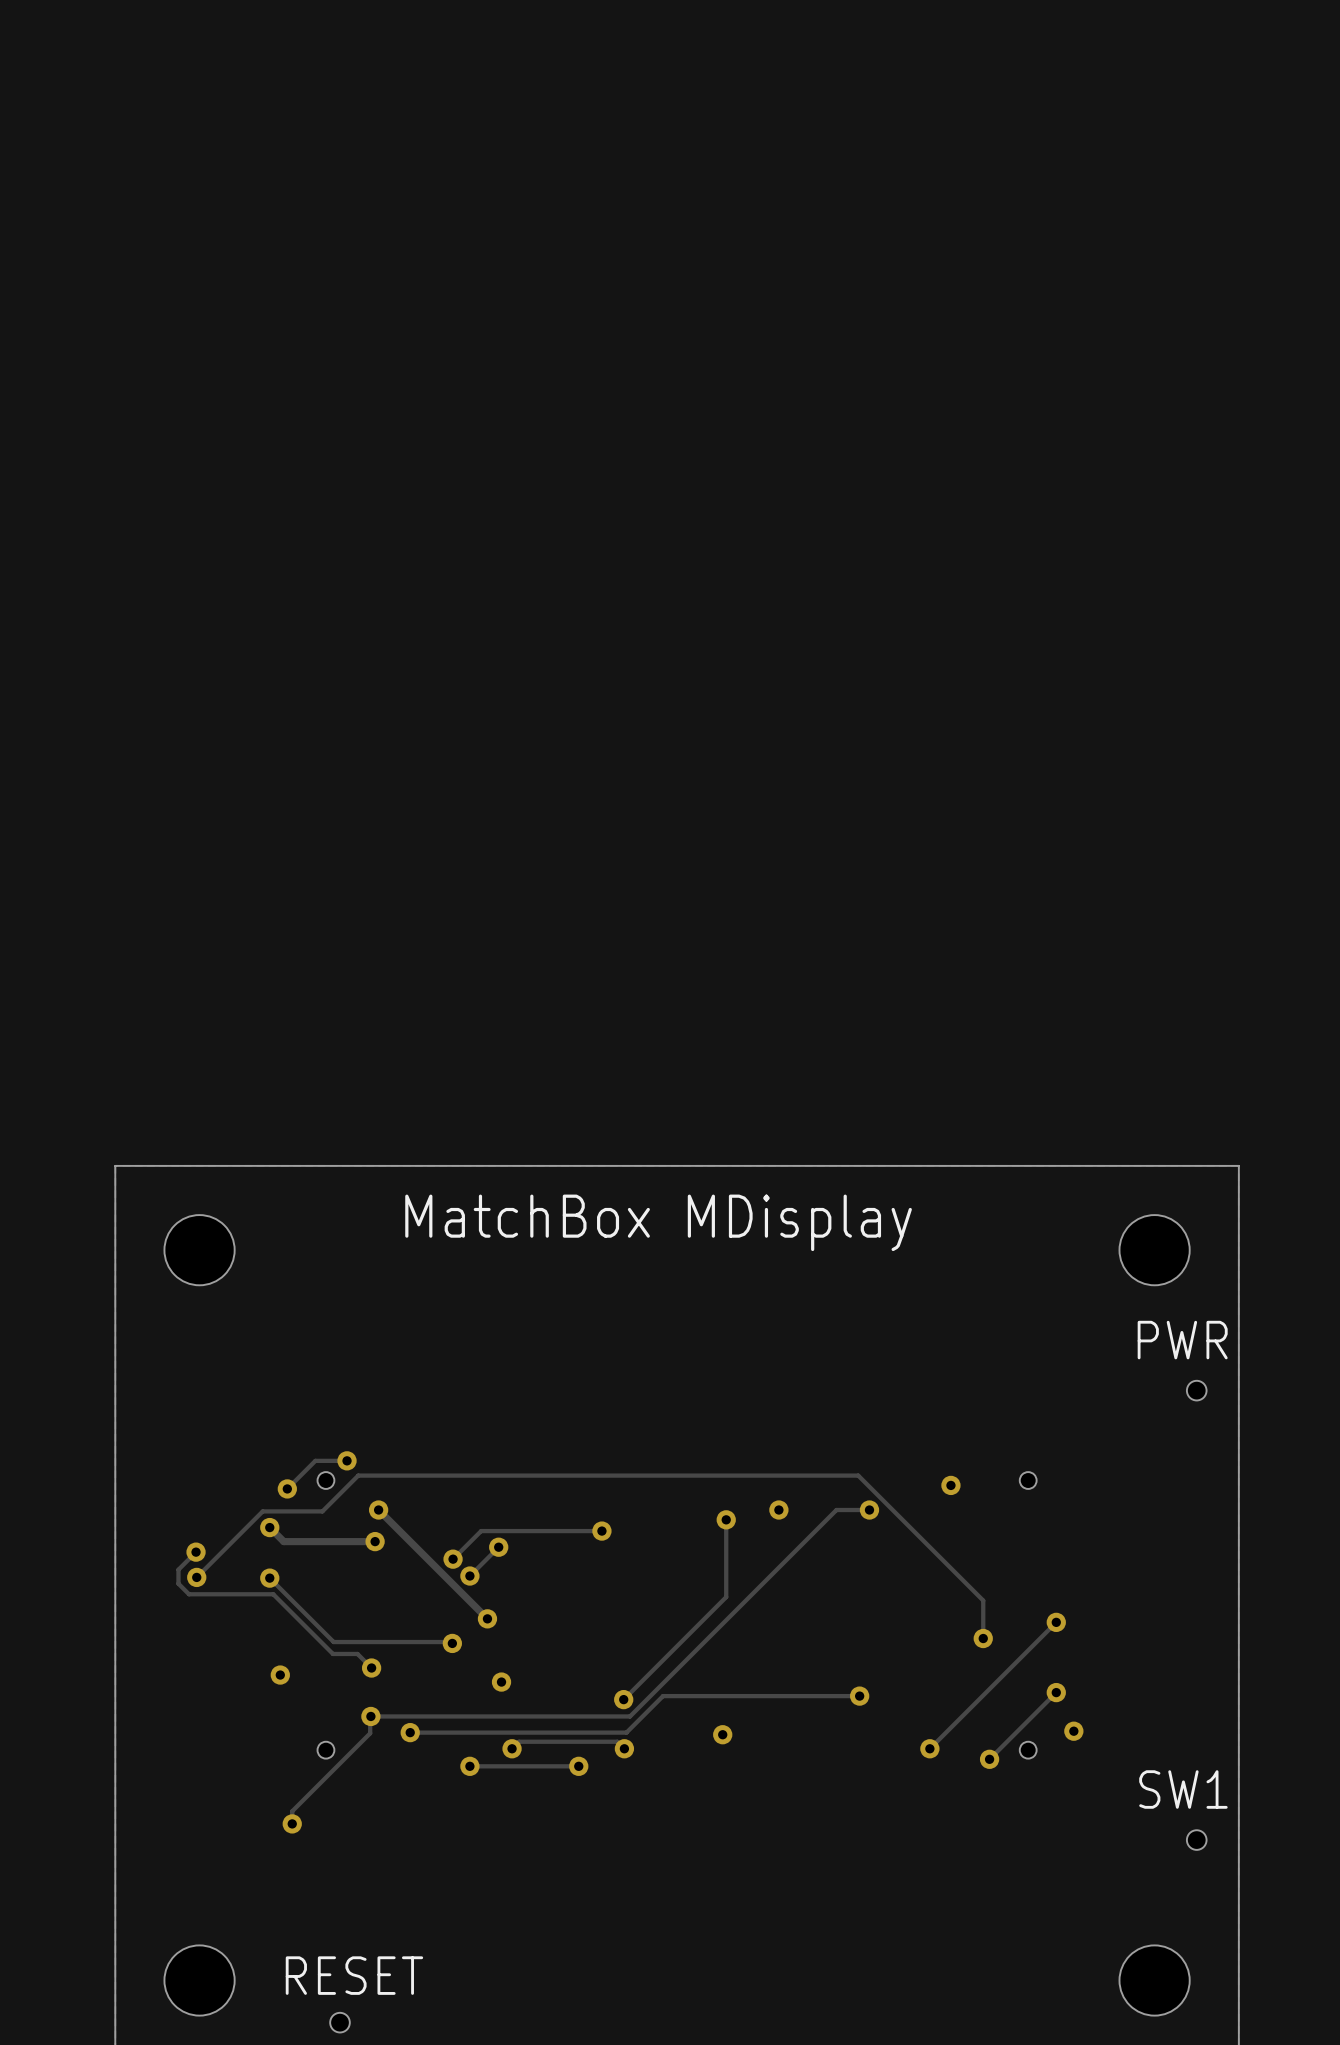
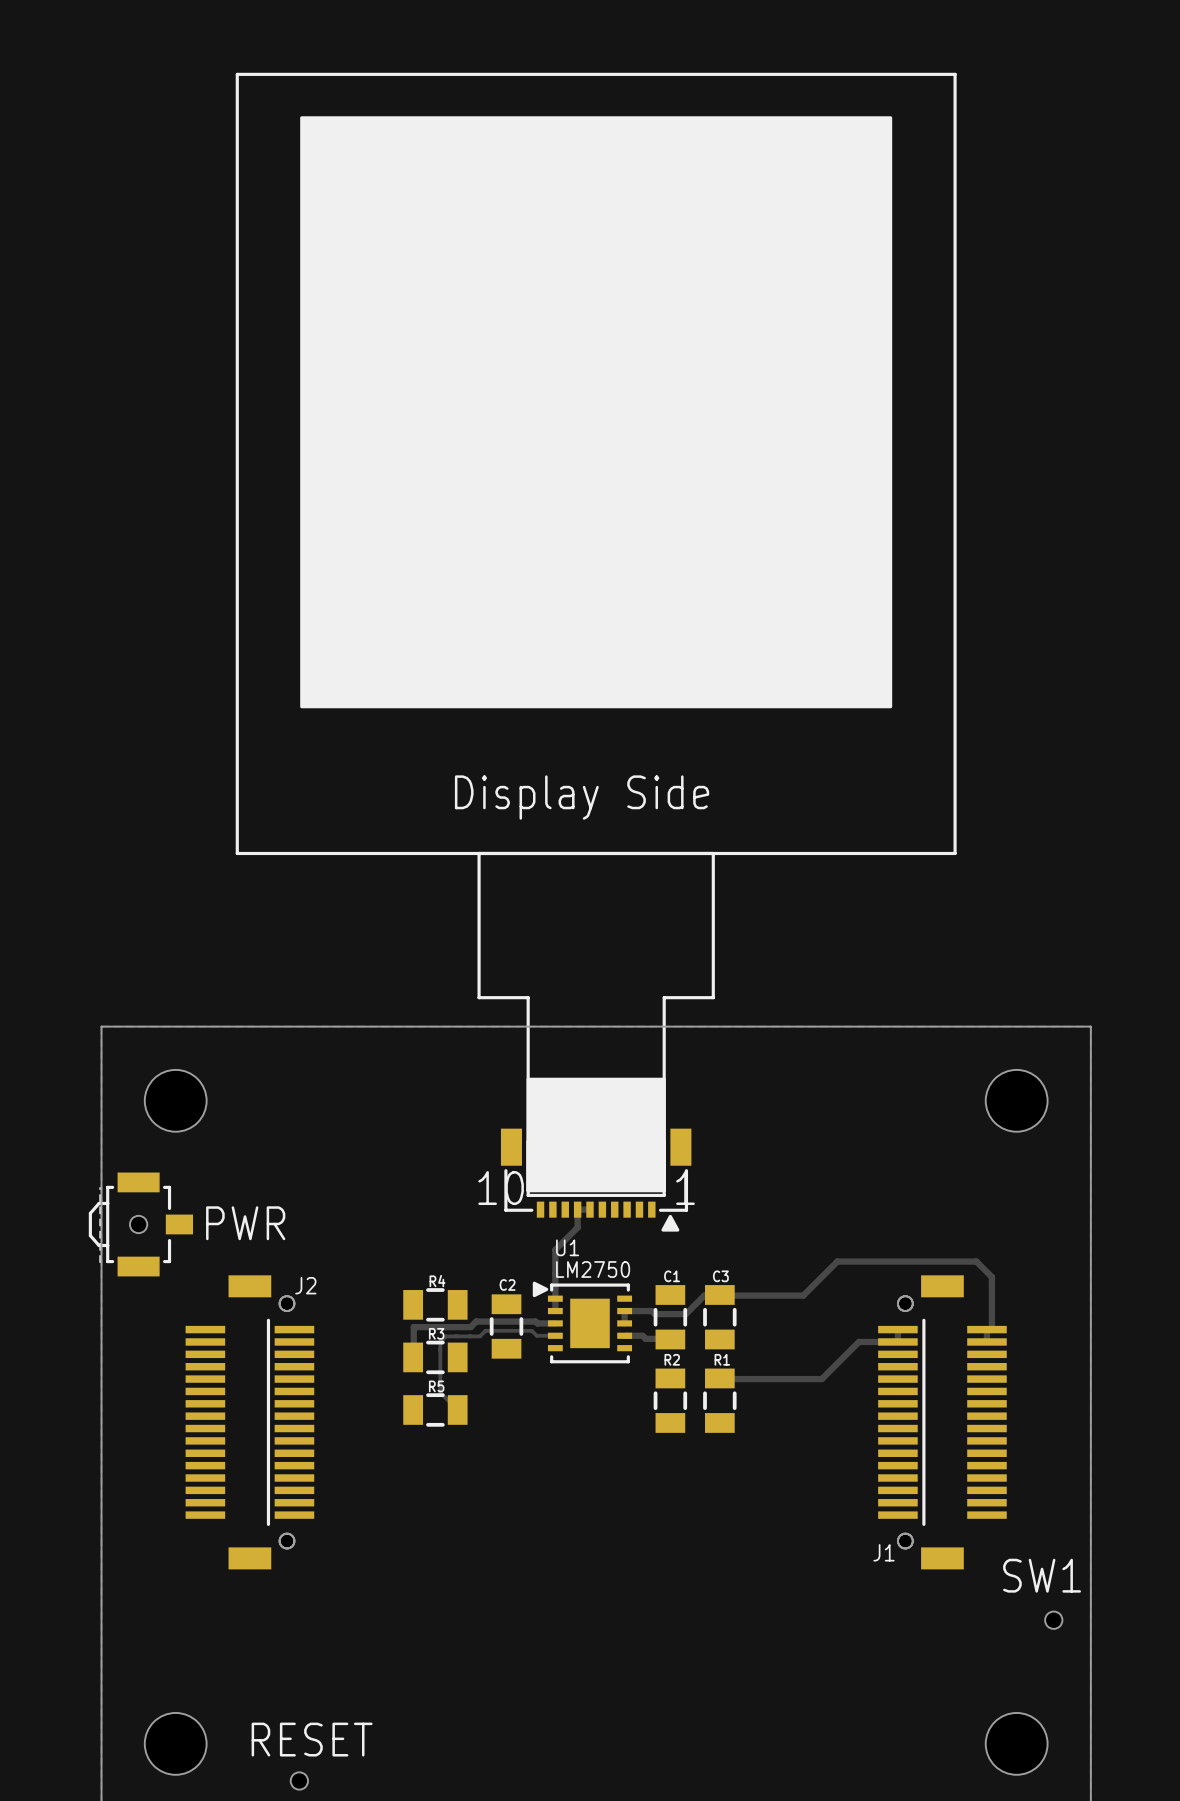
drawing: none -> [235, 72, 957, 1193]
text: MatchBox MDisplay (658, 1222) -> none
part: none -> (596, 1180)
track: none -> (590, 1209) (577, 1209) (577, 1227) (555, 1249) (555, 1311)
PWR: none -> (140, 1224)
PWR: (1196, 1390) -> none
track: (347, 1460) (315, 1460) (287, 1488) -> none
via: (347, 1460) -> none
R4: none -> (435, 1304)
via: (950, 1485) -> none
via: (287, 1488) -> none
C1: none -> (670, 1317)
C3: none -> (719, 1317)
U1: none -> LM2750 (582, 1322)
track: none -> (555, 1323) (476, 1321) (470, 1327) (413, 1327) (413, 1357)
track: none -> (624, 1323) (624, 1311) (651, 1311) (654, 1314) (685, 1314) (704, 1295) (803, 1295) (837, 1261) (976, 1261) (991, 1277) (991, 1329) (986, 1329) (986, 1341)
C2: none -> (506, 1326)
track: (378, 1510) (487, 1618) -> none
via: (378, 1510) -> none
via: (778, 1510) -> none
track: (869, 1510) (836, 1510) (630, 1716) (370, 1716) (370, 1733) (292, 1811) (292, 1823) -> none
via: (869, 1510) -> none
track: none -> (897, 1329) (897, 1341) (858, 1341) (821, 1379) (719, 1378)
track: none -> (555, 1335) (536, 1335) (531, 1330) (485, 1330) (479, 1336) (445, 1336) (440, 1341) (440, 1392) (457, 1409)
track: none -> (624, 1335) (670, 1339)
track: (726, 1519) (726, 1597) (623, 1699) -> none
via: (726, 1519) -> none
track: (269, 1527) (283, 1541) (375, 1541) -> none
via: (269, 1527) -> none
track: (601, 1531) (481, 1531) (453, 1559) -> none
via: (601, 1531) -> none
via: (375, 1541) -> none
R3: none -> (435, 1357)
track: (498, 1547) (469, 1576) -> none
via: (498, 1547) -> none
track: (196, 1552) (178, 1569) (178, 1583) (189, 1594) (273, 1594) (332, 1653) (357, 1653) (371, 1668) -> none
via: (196, 1552) -> none
via: (453, 1559) -> none
via: (469, 1576) -> none
track: (196, 1577) (262, 1511) (322, 1511) (358, 1475) (858, 1475) (983, 1600) (983, 1638) -> none
via: (196, 1577) -> none
track: (269, 1578) (333, 1642) (452, 1643) -> none
via: (269, 1578) -> none
R2: none -> (670, 1400)
R1: none -> (719, 1400)
R5: none -> (435, 1409)
J2: none -> (249, 1422)
J1: none -> (942, 1422)
via: (487, 1618) -> none
track: (1056, 1622) (929, 1748) -> none
via: (1056, 1622) -> none
via: (983, 1638) -> none
via: (452, 1643) -> none
via: (371, 1668) -> none
via: (280, 1675) -> none
via: (501, 1682) -> none
track: (1056, 1692) (989, 1759) -> none
via: (1056, 1692) -> none
track: (859, 1696) (663, 1696) (626, 1732) (410, 1732) -> none
via: (859, 1696) -> none
via: (623, 1699) -> none
via: (370, 1716) -> none
via: (1073, 1731) -> none
via: (410, 1732) -> none
via: (722, 1734) -> none
track: (512, 1748) (519, 1741) (617, 1741) (624, 1748) -> none
via: (512, 1748) -> none
via: (624, 1748) -> none
via: (929, 1748) -> none
via: (989, 1759) -> none
track: (469, 1766) (578, 1766) -> none
via: (469, 1766) -> none
via: (578, 1766) -> none
via: (292, 1823) -> none

